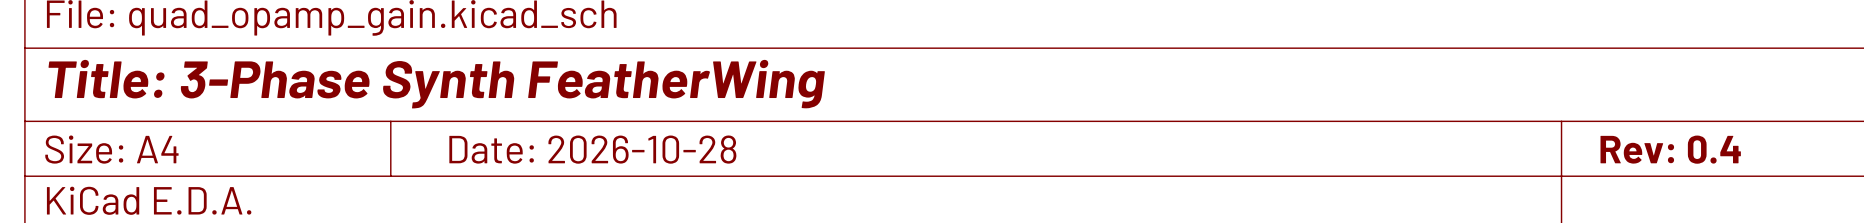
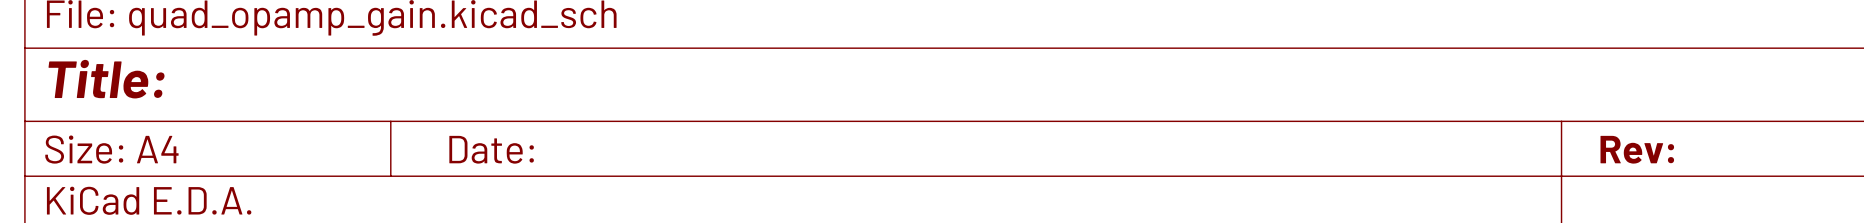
title block: Title: 3-Phase Synth FeatherWing (436, 84) -> Title: (106, 79)
title block: Date: 2026-10-28 (592, 149) -> Date: (491, 149)
title block: Rev: 0.4 (1670, 149) -> Rev: (1637, 149)

